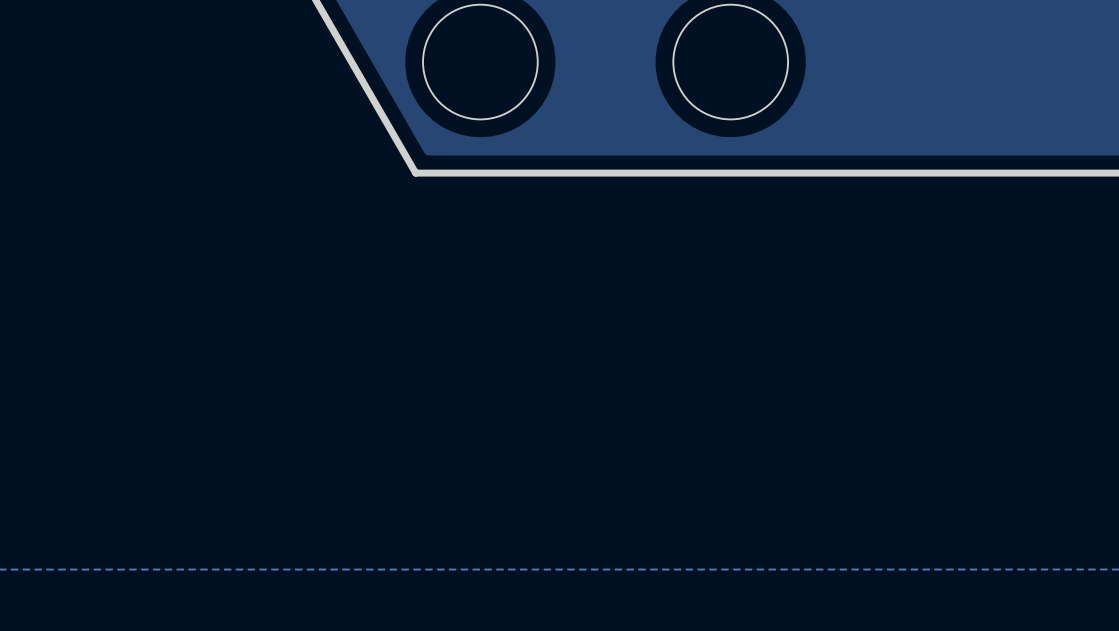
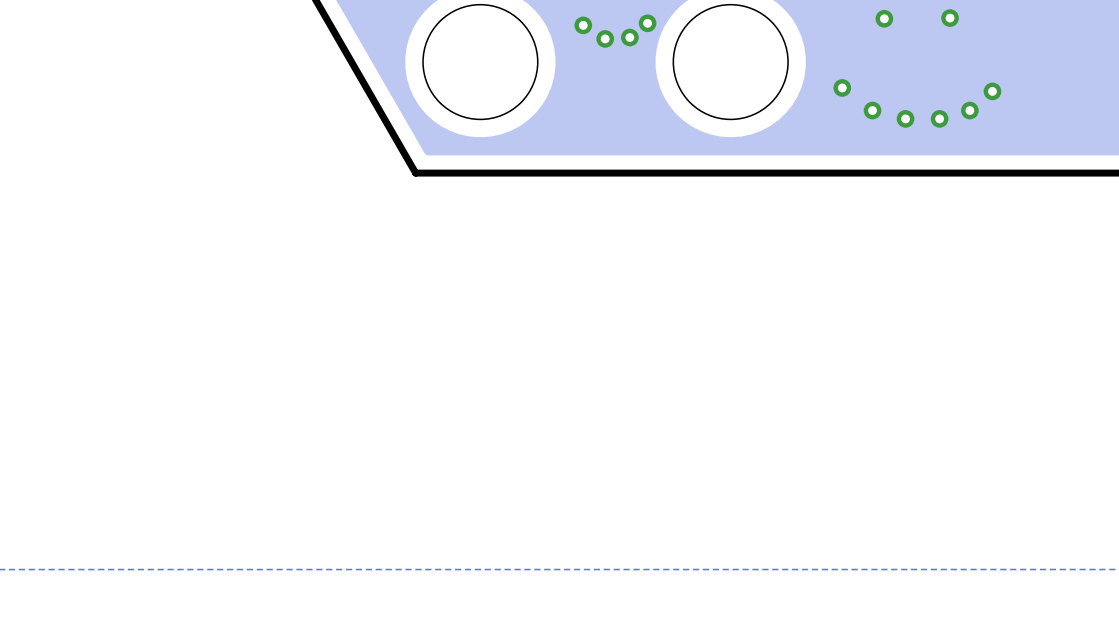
via: none -> (884, 18)
via: none -> (950, 18)
via: none -> (647, 23)
via: none -> (583, 25)
via: none -> (629, 37)
via: none -> (605, 38)
via: none -> (842, 87)
via: none -> (992, 91)
via: none -> (872, 110)
via: none -> (969, 110)
via: none -> (905, 118)
via: none -> (939, 118)

